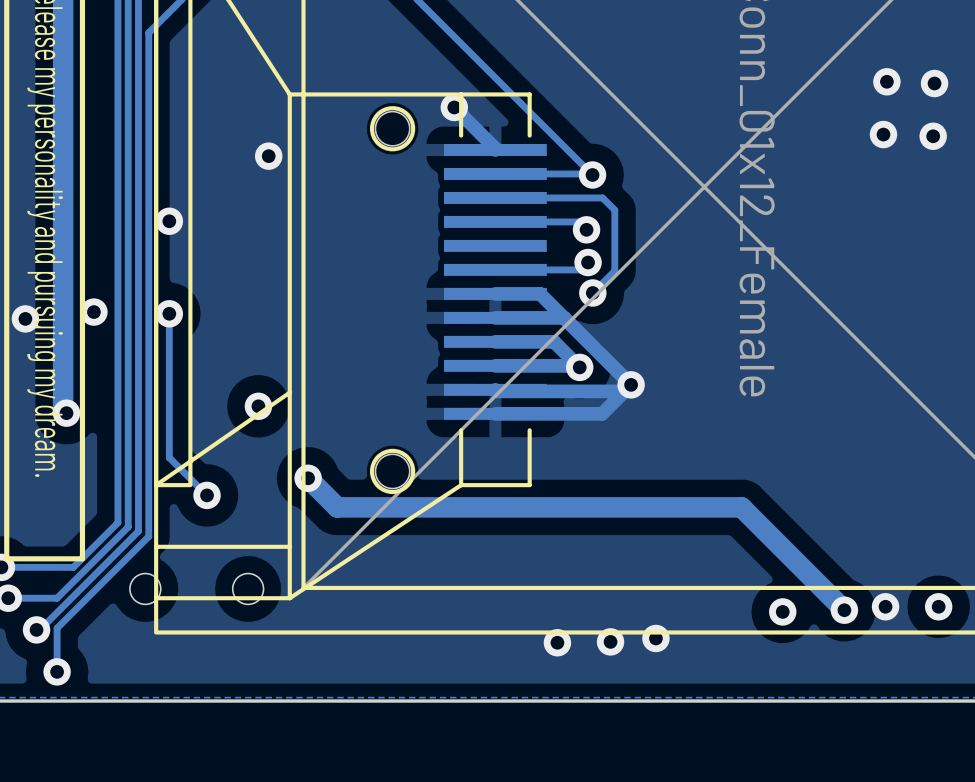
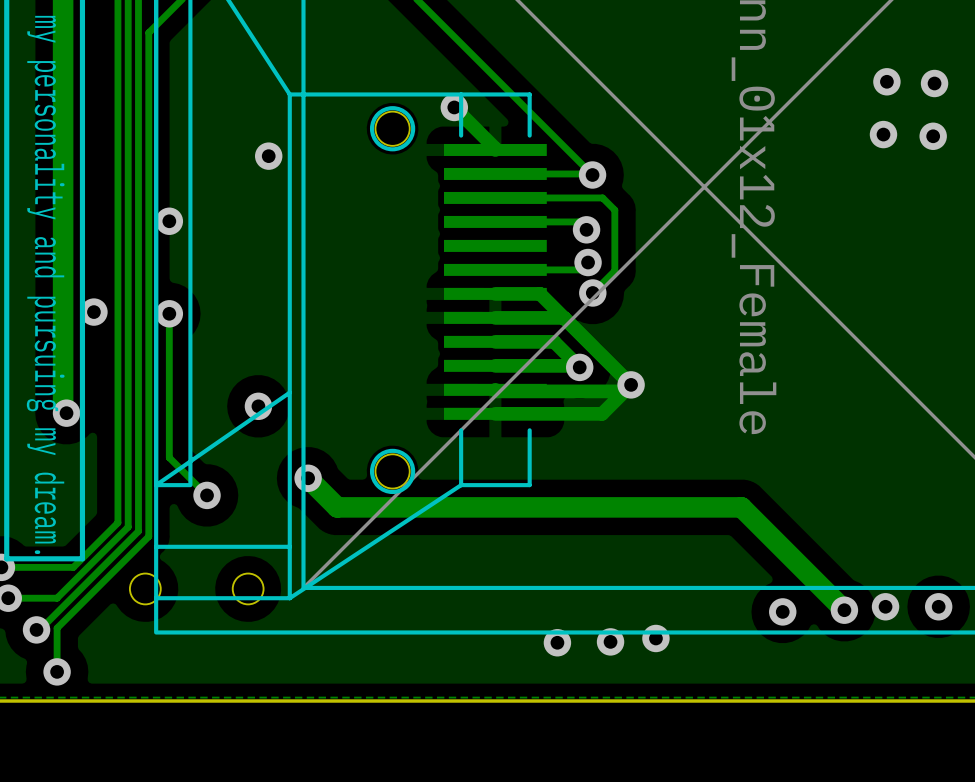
via: (25, 318) -> none

